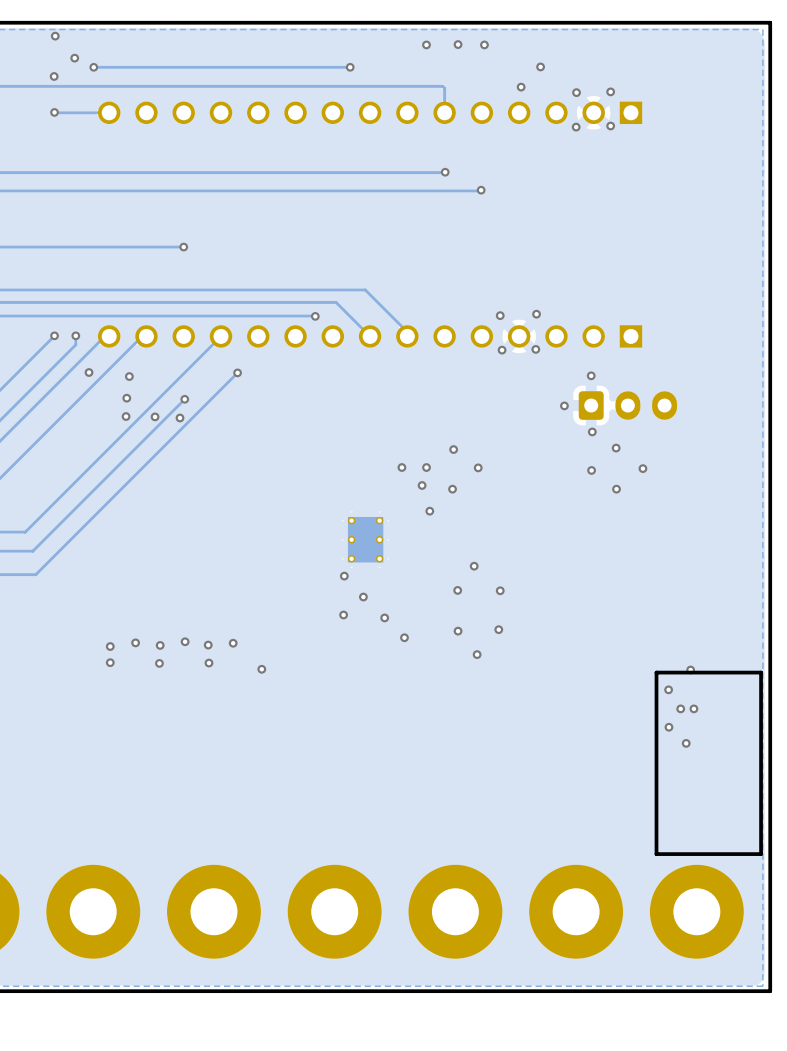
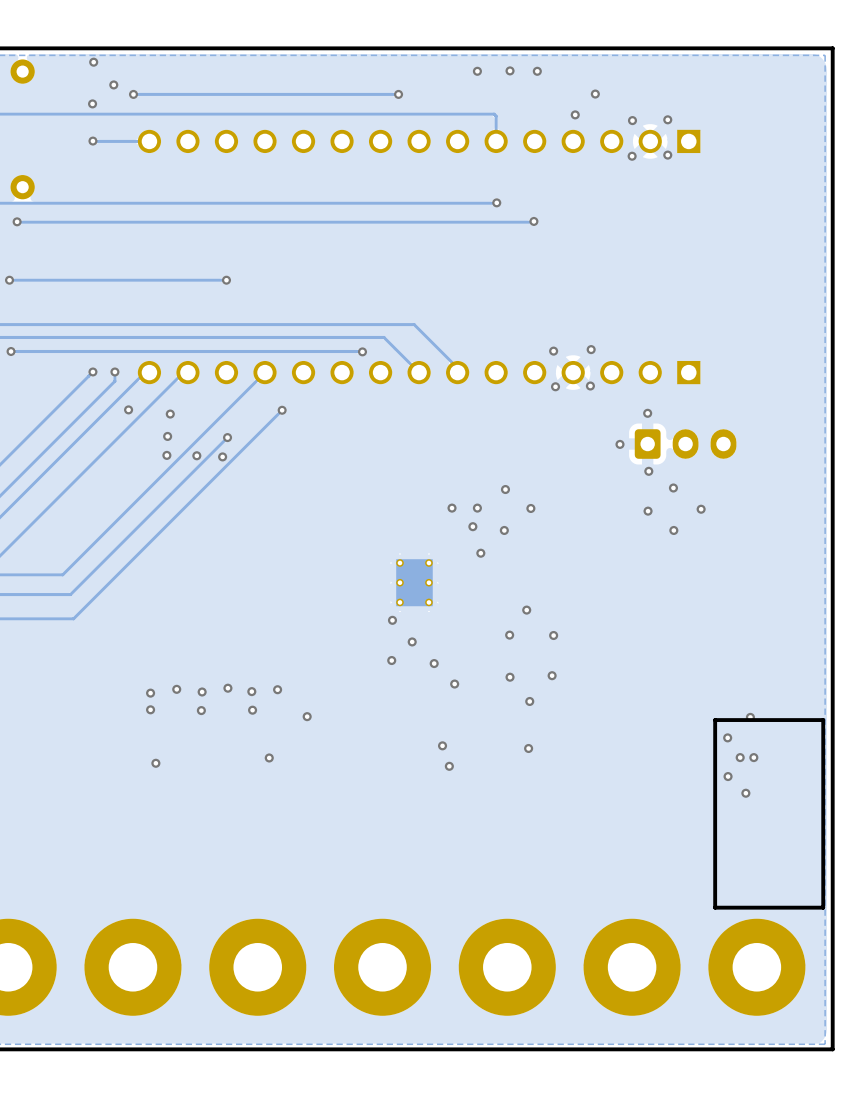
via: none -> (442, 745)
via: none -> (528, 748)
via: none -> (269, 757)
via: none -> (155, 763)
via: none -> (449, 766)

